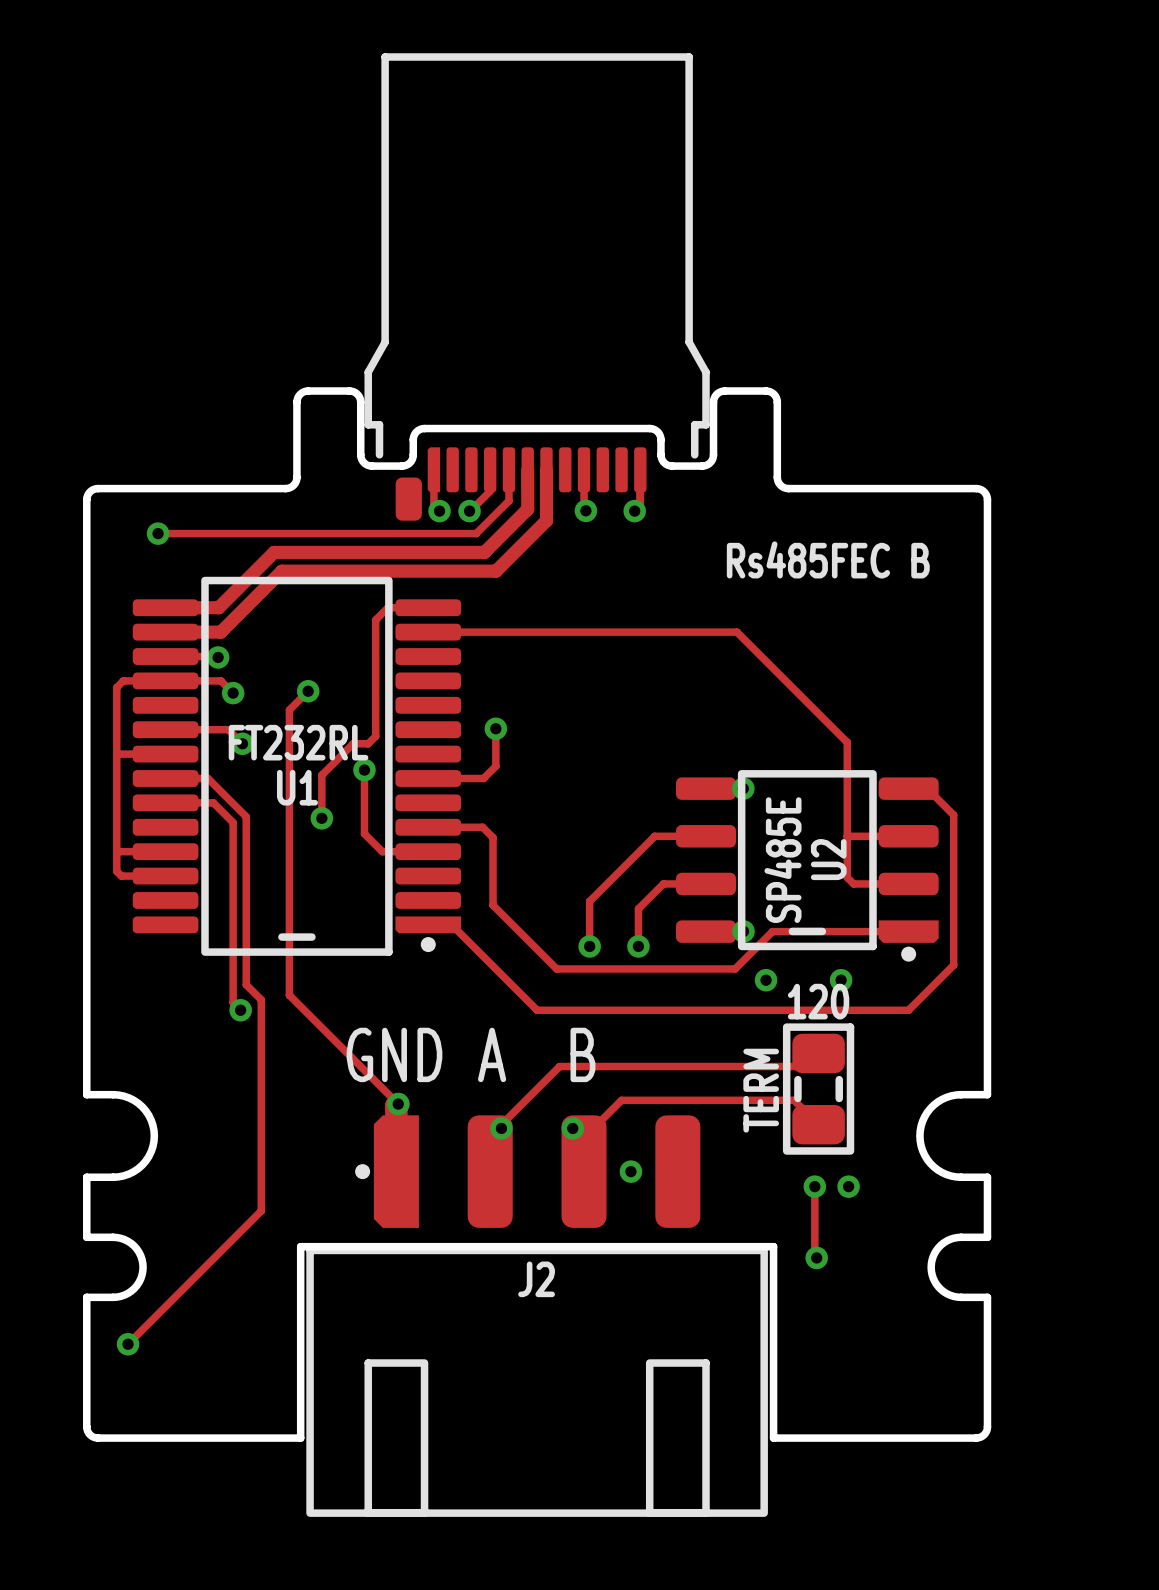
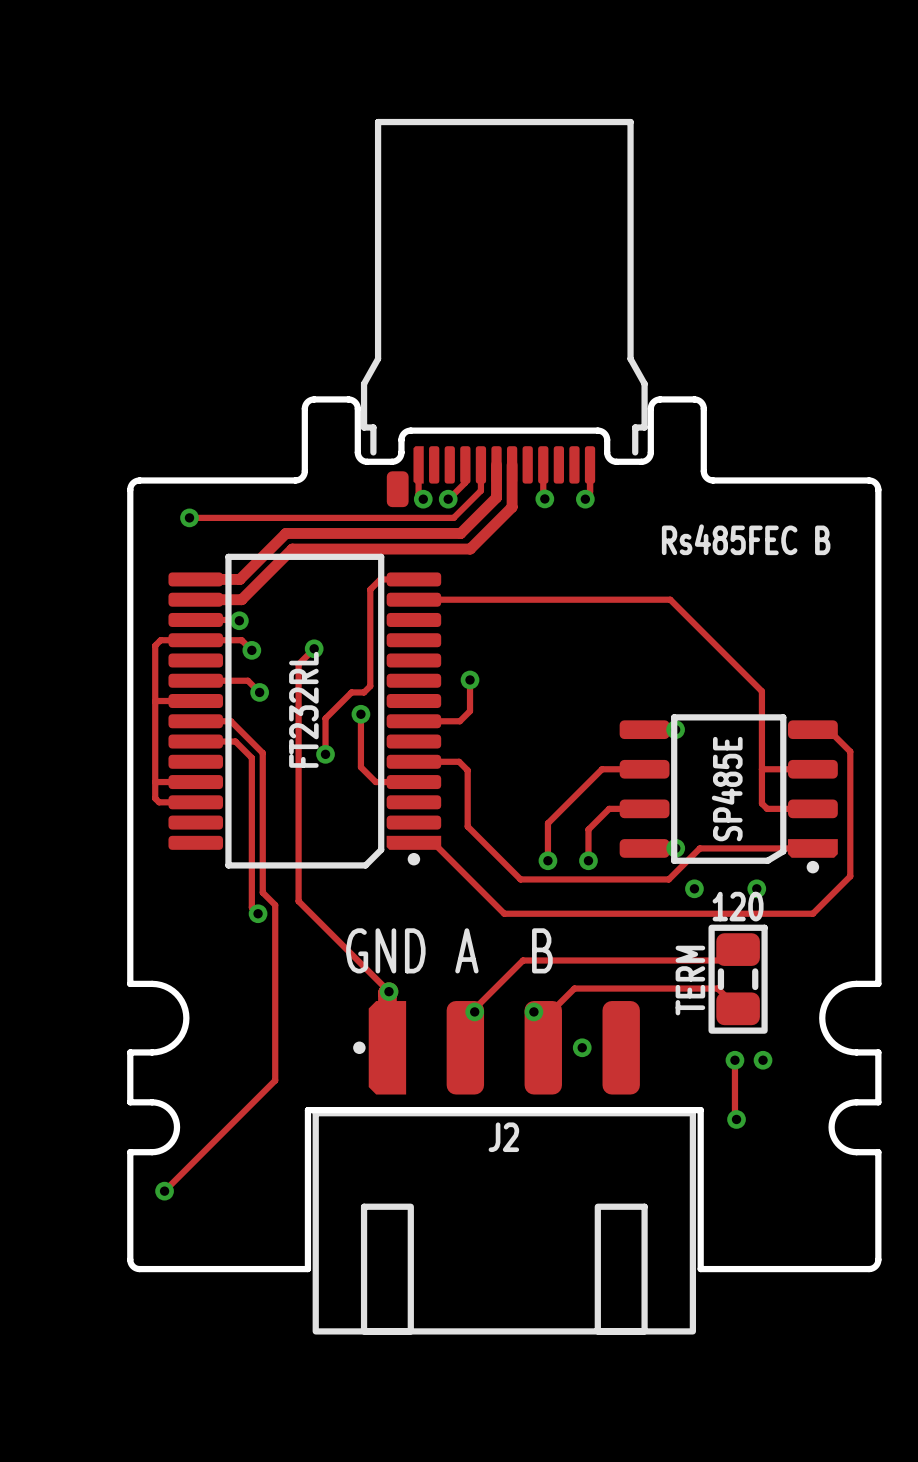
U1: FT232RL (296, 766) -> none
part: none -> FT232RL (304, 711)
U2: SP485E (807, 865) -> none
part: none -> SP485E (728, 793)

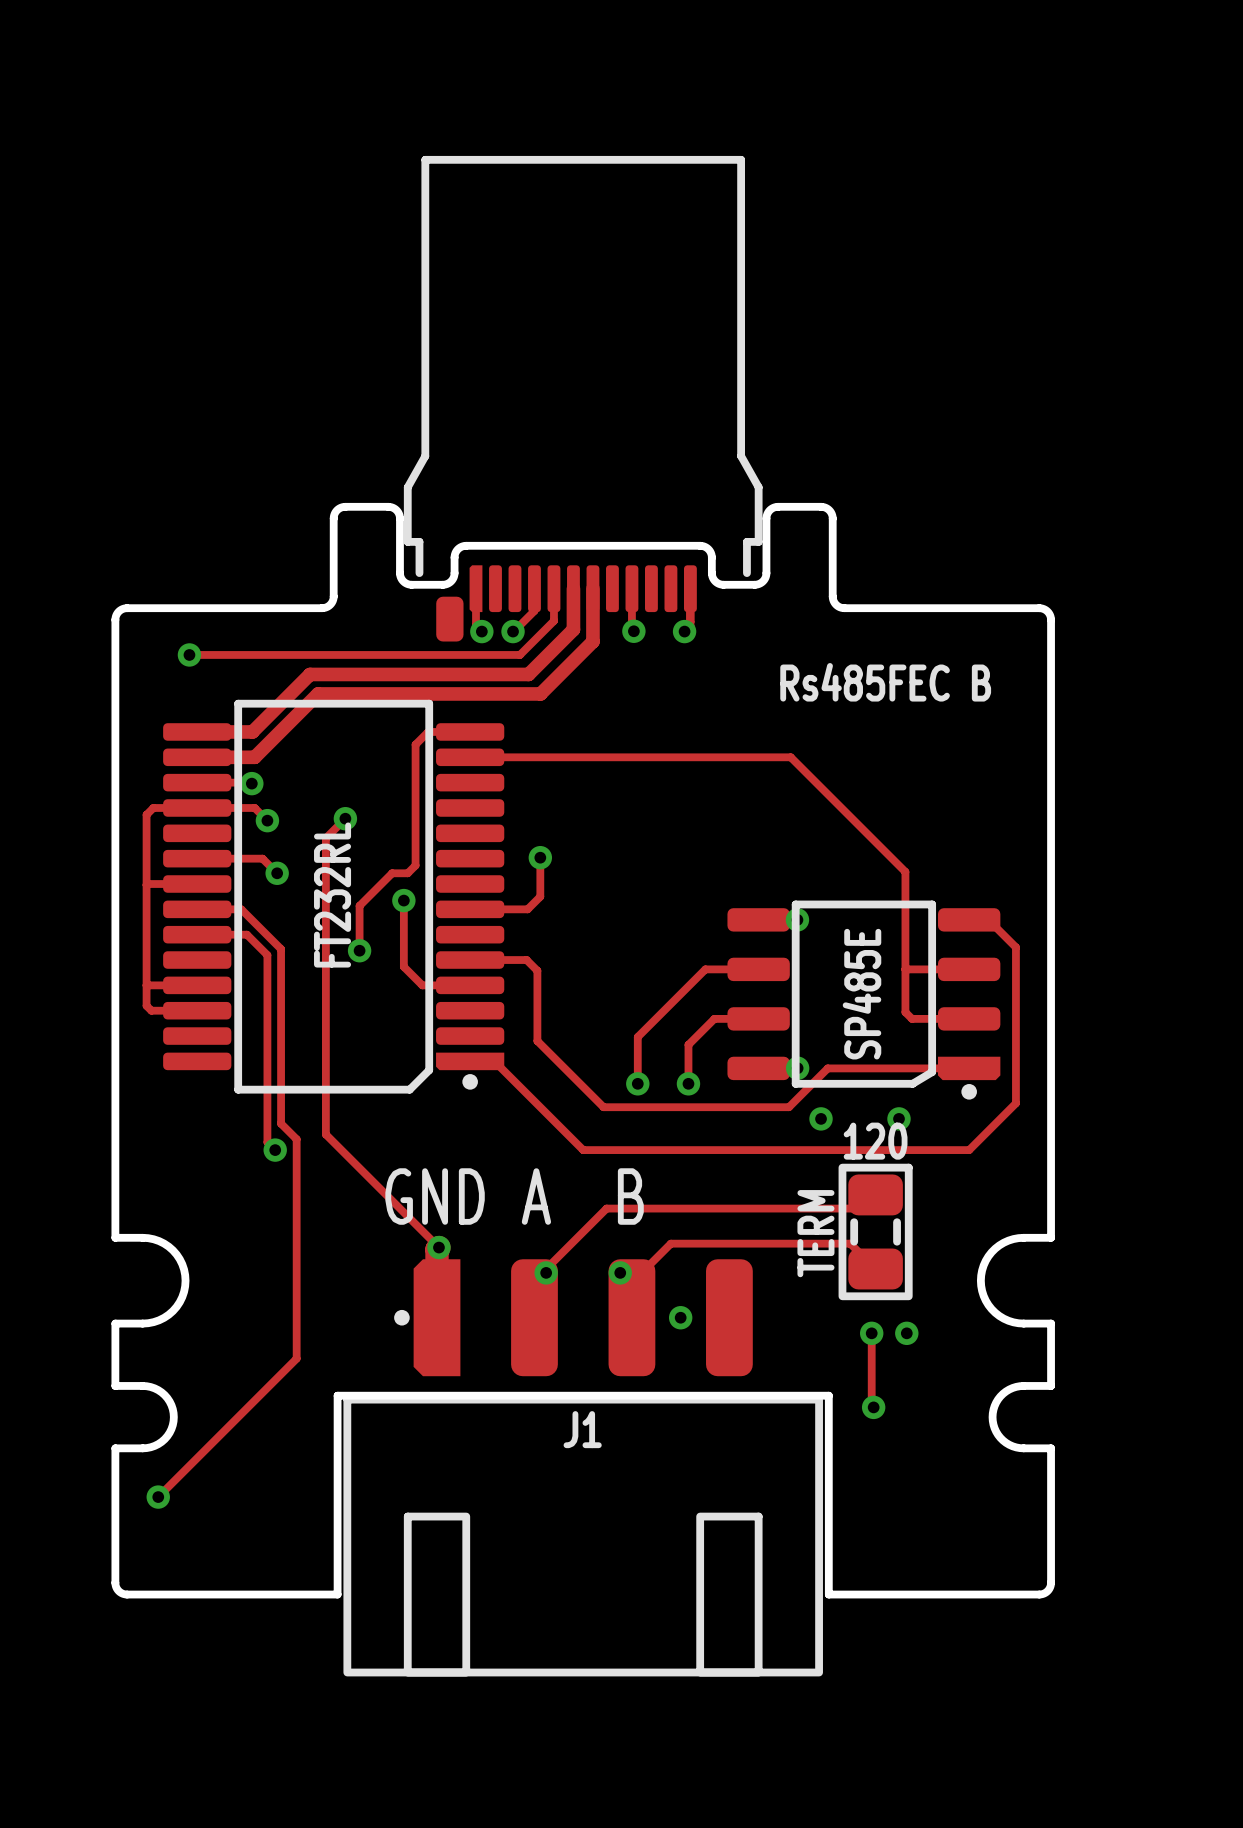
J2 name: J2 (503, 1137) -> J1 (582, 1429)

